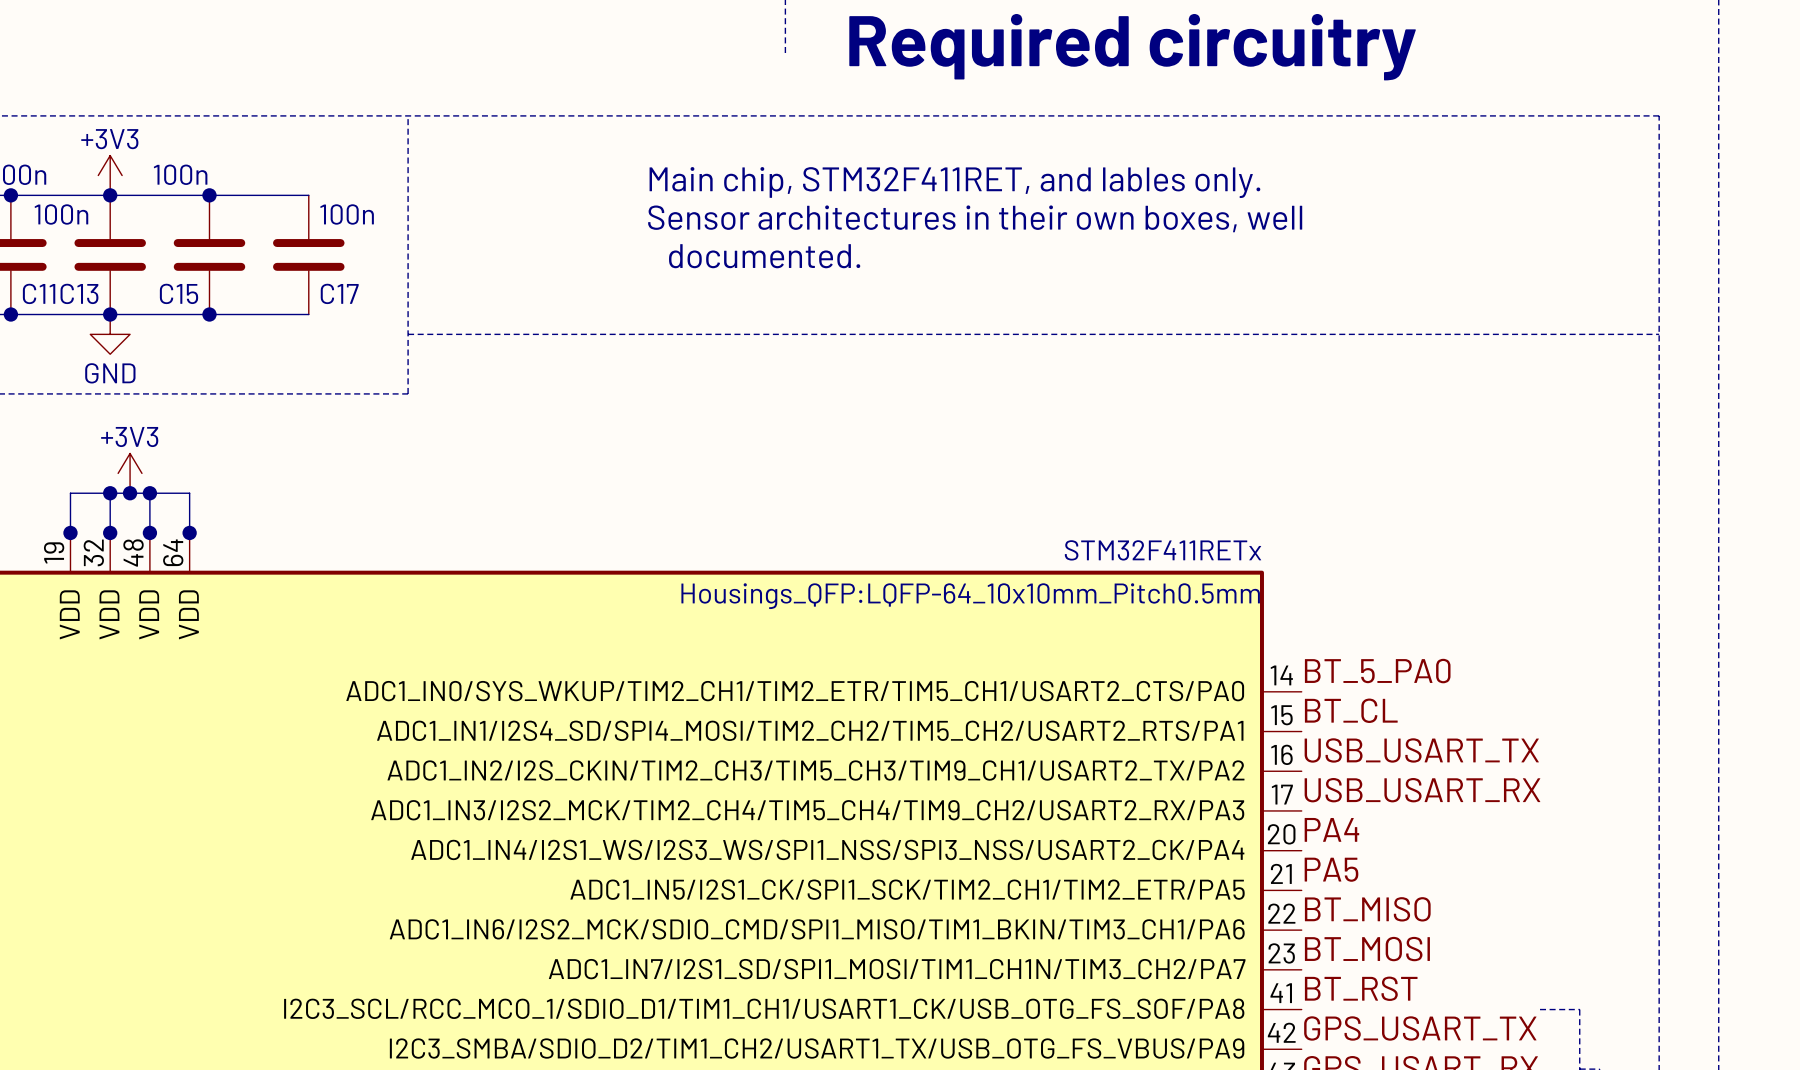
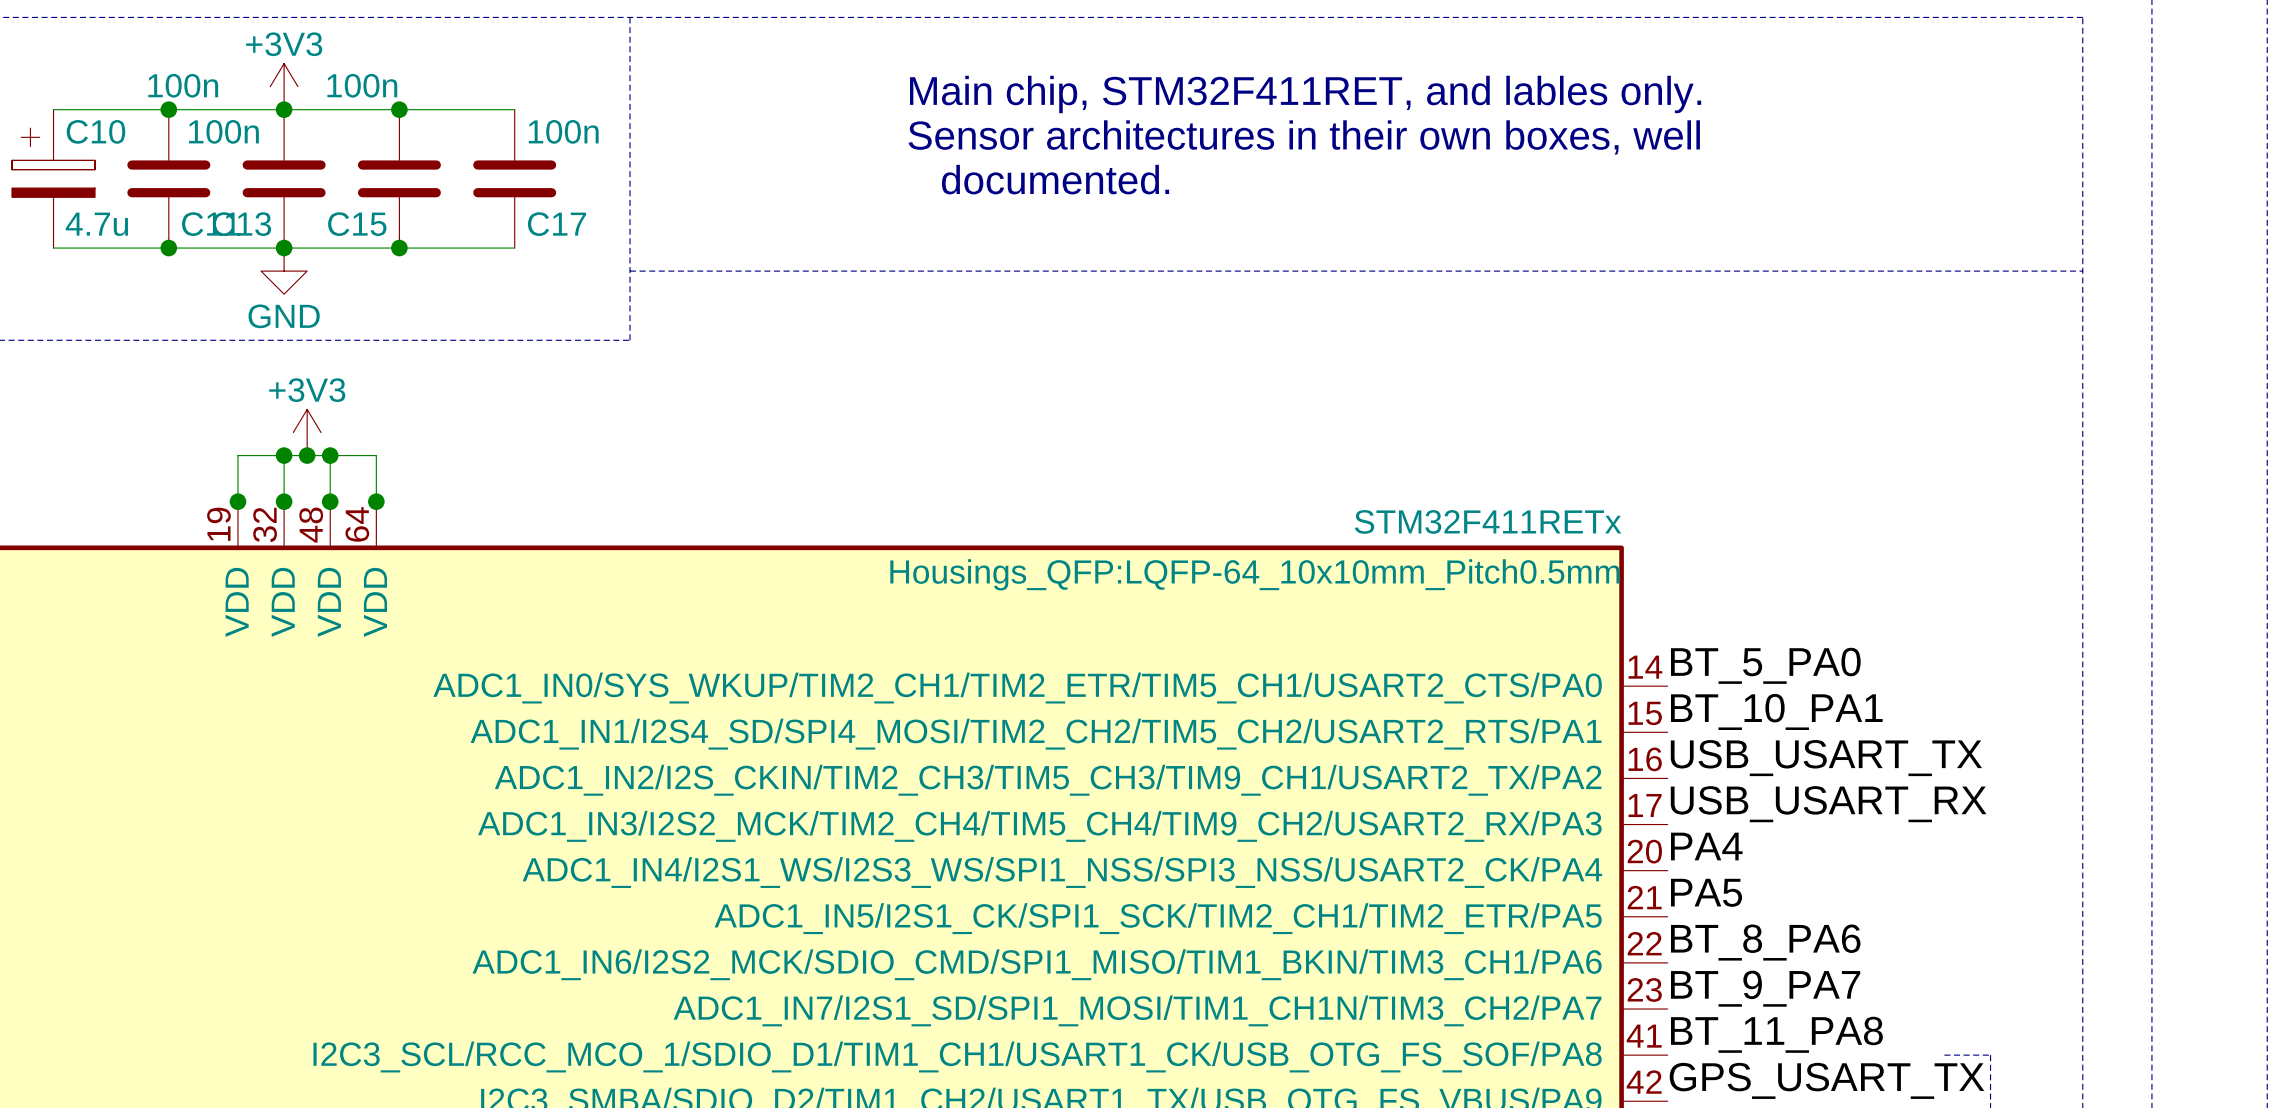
label: BT_CL (1351, 710) -> BT_10_PA1 (1776, 711)
label: BT_MISO (1367, 909) -> BT_8_PA6 (1765, 942)
label: BT_MOSI (1367, 949) -> BT_9_PA7 (1765, 988)
label: BT_RST (1361, 988) -> BT_11_PA8 (1776, 1034)

